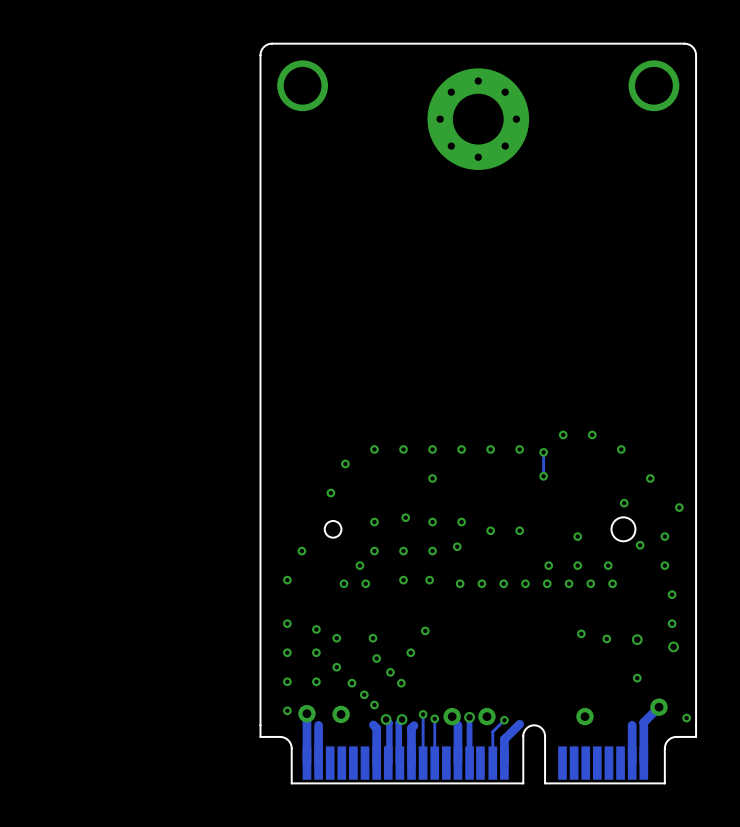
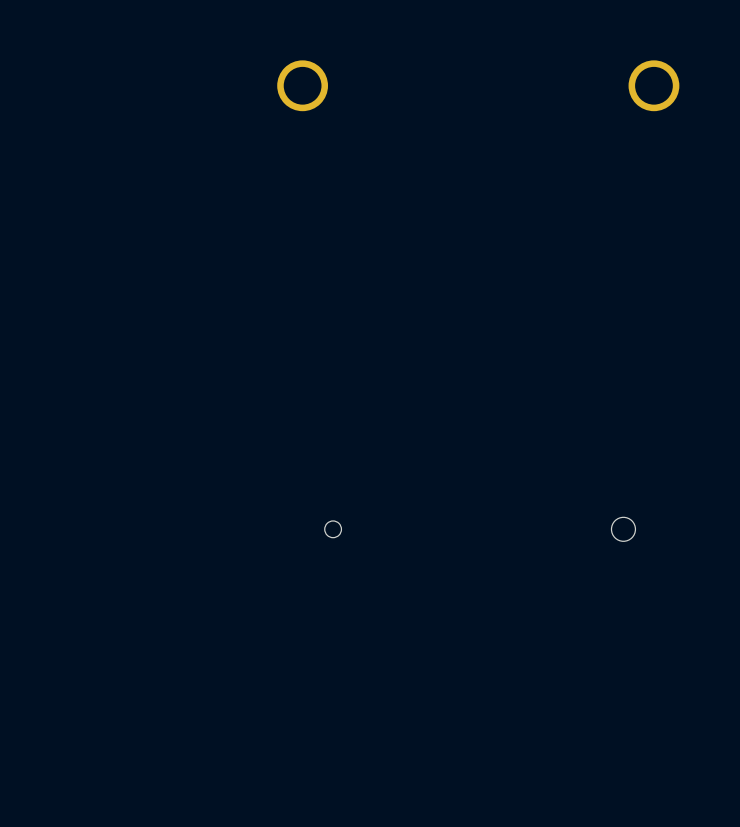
part: (478, 119) -> none
via: (563, 434) -> none
via: (592, 434) -> none
via: (374, 449) -> none
via: (403, 449) -> none
via: (432, 449) -> none
via: (461, 449) -> none
via: (490, 449) -> none
via: (519, 449) -> none
via: (621, 449) -> none
track: (543, 452) (543, 476) -> none
via: (543, 452) -> none
via: (345, 463) -> none
via: (543, 476) -> none
via: (432, 478) -> none
via: (650, 478) -> none
via: (330, 493) -> none
via: (624, 503) -> none
via: (679, 507) -> none
via: (405, 517) -> none
via: (374, 522) -> none
via: (432, 522) -> none
via: (461, 522) -> none
via: (490, 530) -> none
via: (519, 530) -> none
via: (577, 536) -> none
via: (664, 536) -> none
via: (640, 545) -> none
via: (457, 546) -> none
via: (301, 551) -> none
via: (374, 551) -> none
via: (403, 551) -> none
via: (432, 551) -> none
via: (359, 565) -> none
via: (548, 565) -> none
via: (577, 565) -> none
via: (608, 565) -> none
via: (664, 565) -> none
via: (287, 580) -> none
via: (403, 580) -> none
via: (429, 580) -> none
via: (343, 583) -> none
via: (365, 583) -> none
via: (460, 583) -> none
via: (481, 583) -> none
via: (503, 583) -> none
via: (525, 583) -> none
via: (547, 583) -> none
via: (569, 583) -> none
via: (590, 583) -> none
via: (612, 583) -> none
via: (672, 594) -> none
via: (287, 623) -> none
via: (672, 623) -> none
via: (316, 629) -> none
via: (425, 630) -> none
via: (581, 633) -> none
via: (336, 638) -> none
via: (373, 638) -> none
via: (606, 638) -> none
via: (637, 639) -> none
via: (673, 646) -> none
via: (287, 652) -> none
via: (316, 652) -> none
via: (410, 652) -> none
via: (376, 658) -> none
via: (336, 667) -> none
via: (390, 672) -> none
via: (637, 678) -> none
via: (287, 681) -> none
via: (316, 681) -> none
via: (351, 683) -> none
via: (401, 683) -> none
via: (364, 694) -> none
via: (374, 704) -> none
track: (659, 707) (643, 722) (643, 763) -> none
via: (659, 707) -> none
via: (287, 710) -> none
track: (306, 713) (306, 763) -> none
via: (306, 713) -> none
via: (341, 714) -> none
track: (423, 714) (423, 763) -> none
via: (423, 714) -> none
via: (452, 716) -> none
via: (486, 716) -> none
via: (584, 716) -> none
track: (469, 717) (469, 763) -> none
via: (469, 717) -> none
track: (434, 718) (434, 763) -> none
via: (434, 718) -> none
via: (686, 718) -> none
track: (386, 719) (389, 722) (388, 763) -> none
via: (386, 719) -> none
track: (402, 719) (398, 722) (398, 761) -> none
via: (402, 719) -> none
track: (504, 720) (492, 731) (492, 763) -> none
via: (504, 720) -> none
track: (373, 724) (376, 728) (376, 763) -> none
track: (519, 724) (504, 739) (504, 763) -> none
track: (318, 725) (318, 763) -> none
track: (414, 725) (411, 728) (411, 763) -> none
track: (457, 725) (457, 763) -> none
track: (632, 725) (632, 763) -> none
board edge: (696, 725) (696, 55) (692, 47) (684, 43) (272, 43) (266, 45) (262, 49) (260, 55) (260, 725) -> none
part: (478, 754) -> none

